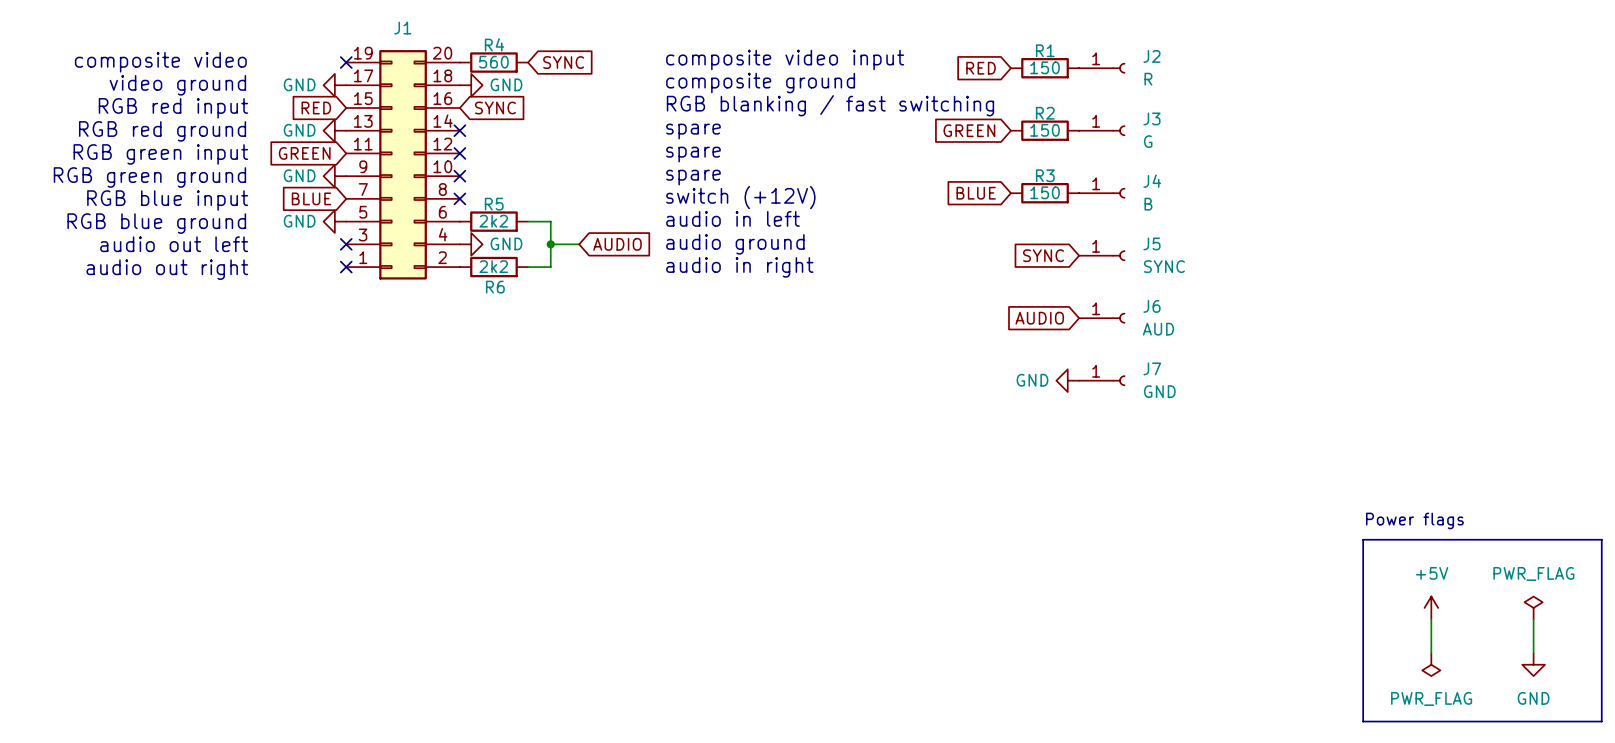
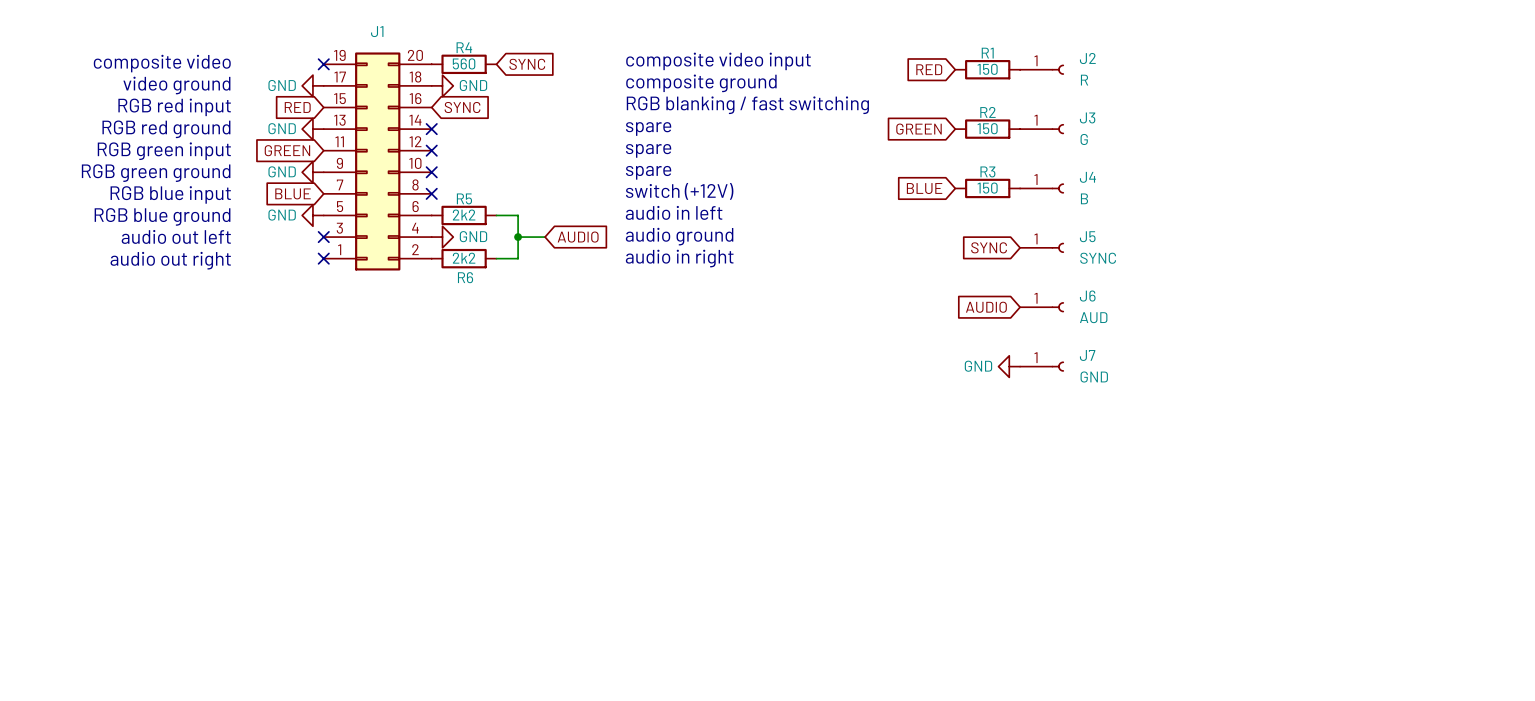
text: Power flags (1414, 520) -> none
line: (1363, 539) (1601, 539) (1601, 721) (1363, 721) (1363, 539) -> none
power symbol: +5V (1431, 607) -> none
power symbol: PWR_FLAG (1533, 607) -> none
wire: (1431, 619) (1431, 653) -> none
wire: (1533, 619) (1533, 653) -> none
power symbol: PWR_FLAG (1431, 664) -> none
power symbol: GND (1533, 664) -> none

